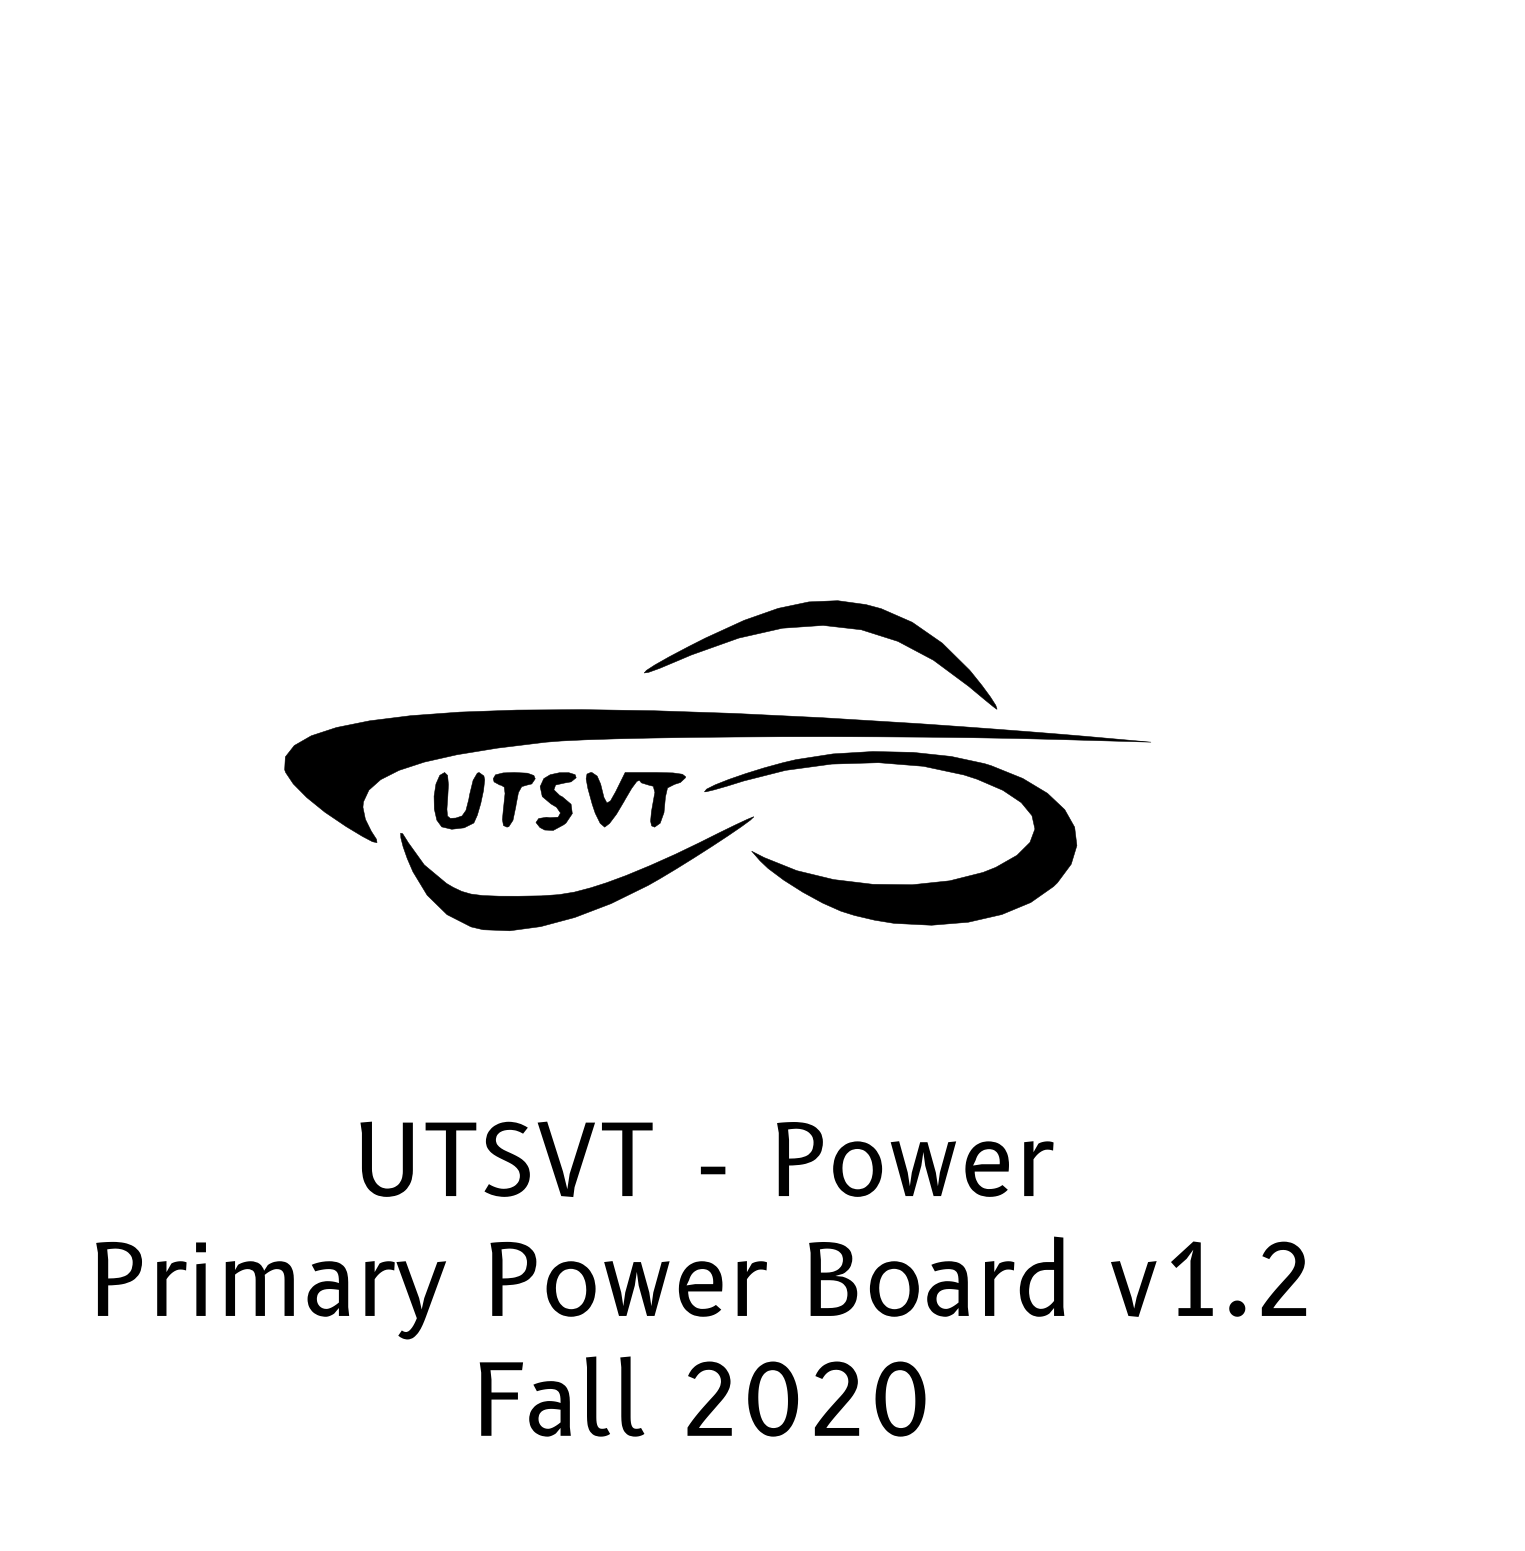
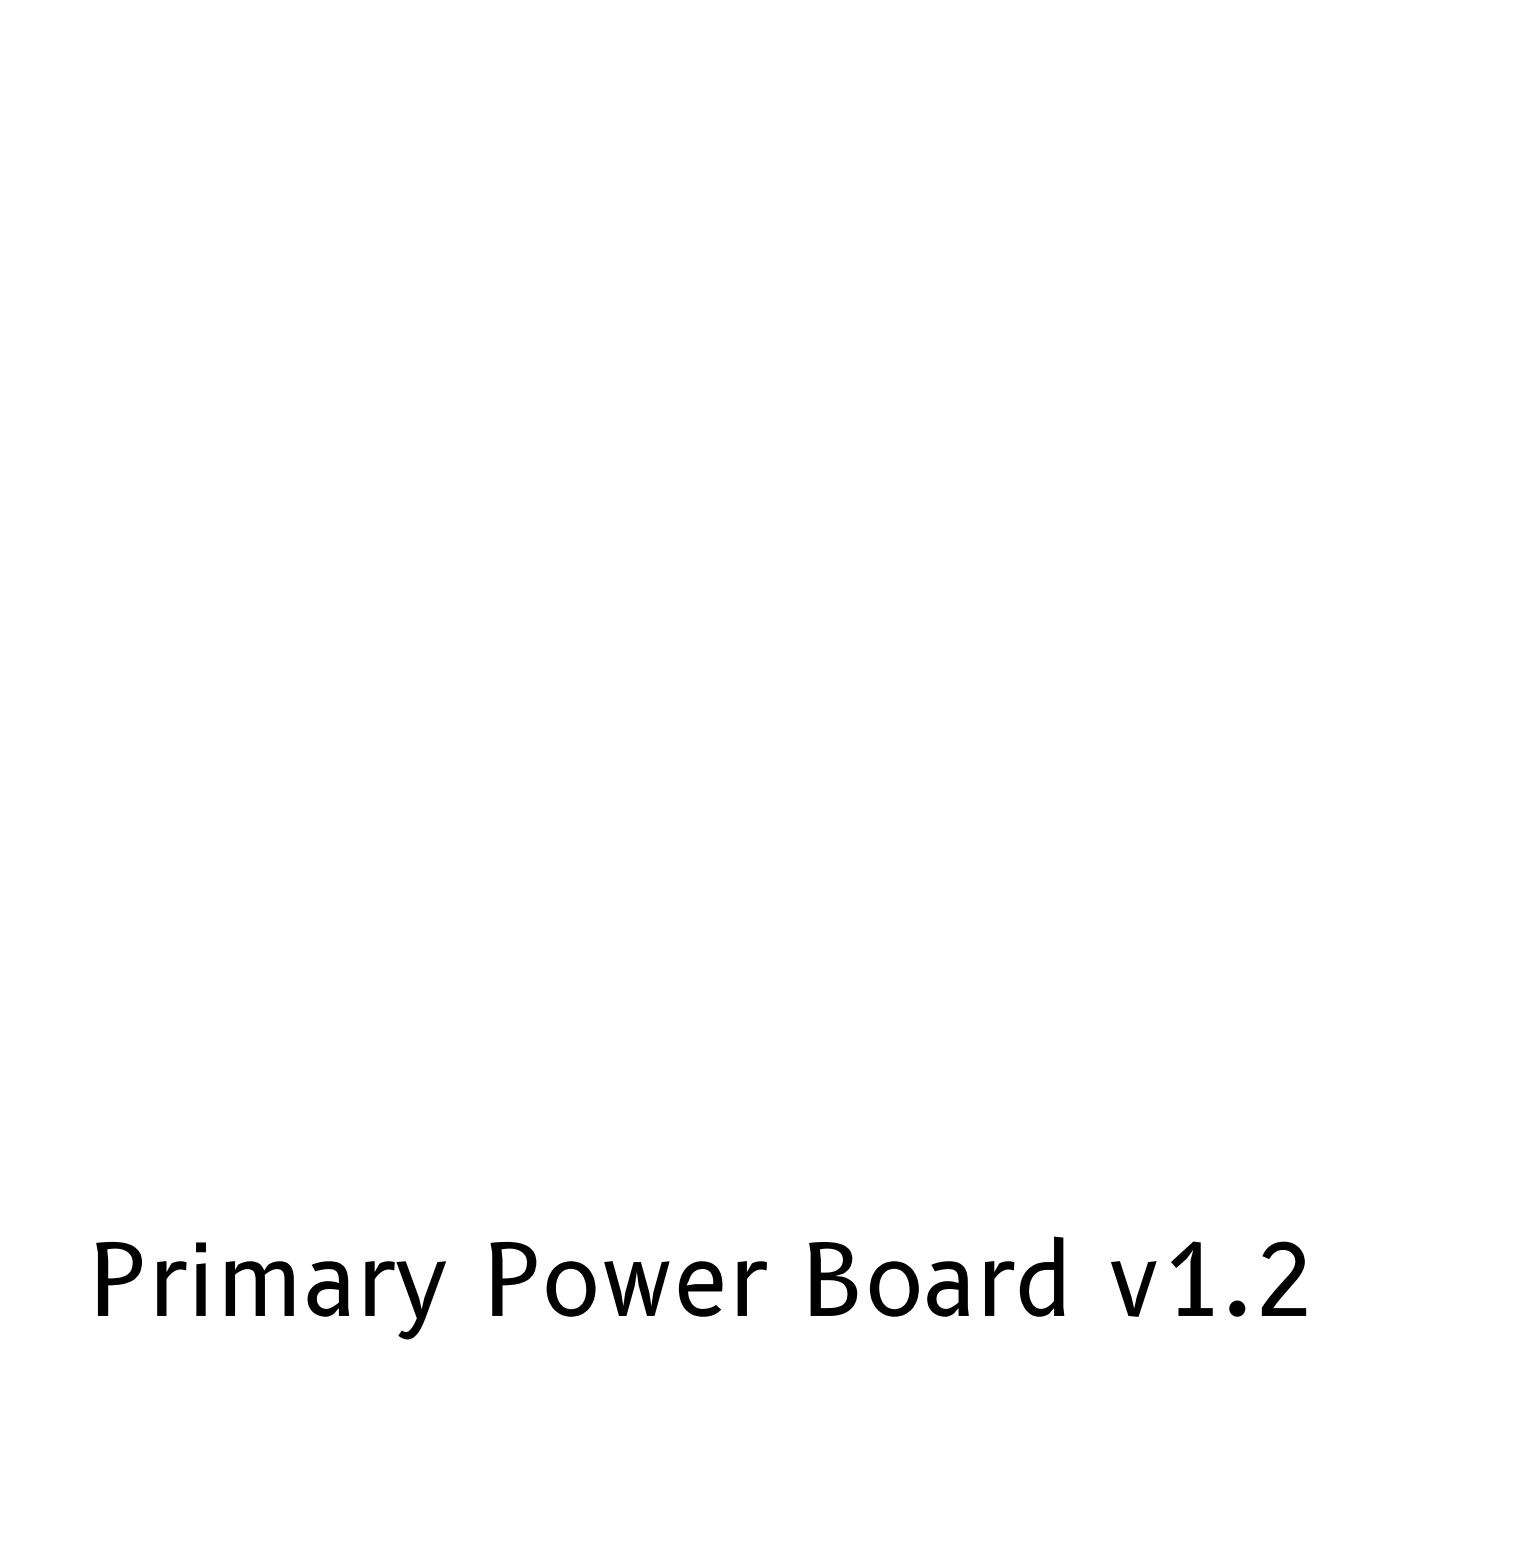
drawing: [284, 600, 1152, 932] -> none
text: UTSVT - Power (707, 1159) -> none
text: Fall 2020 (702, 1396) -> none

